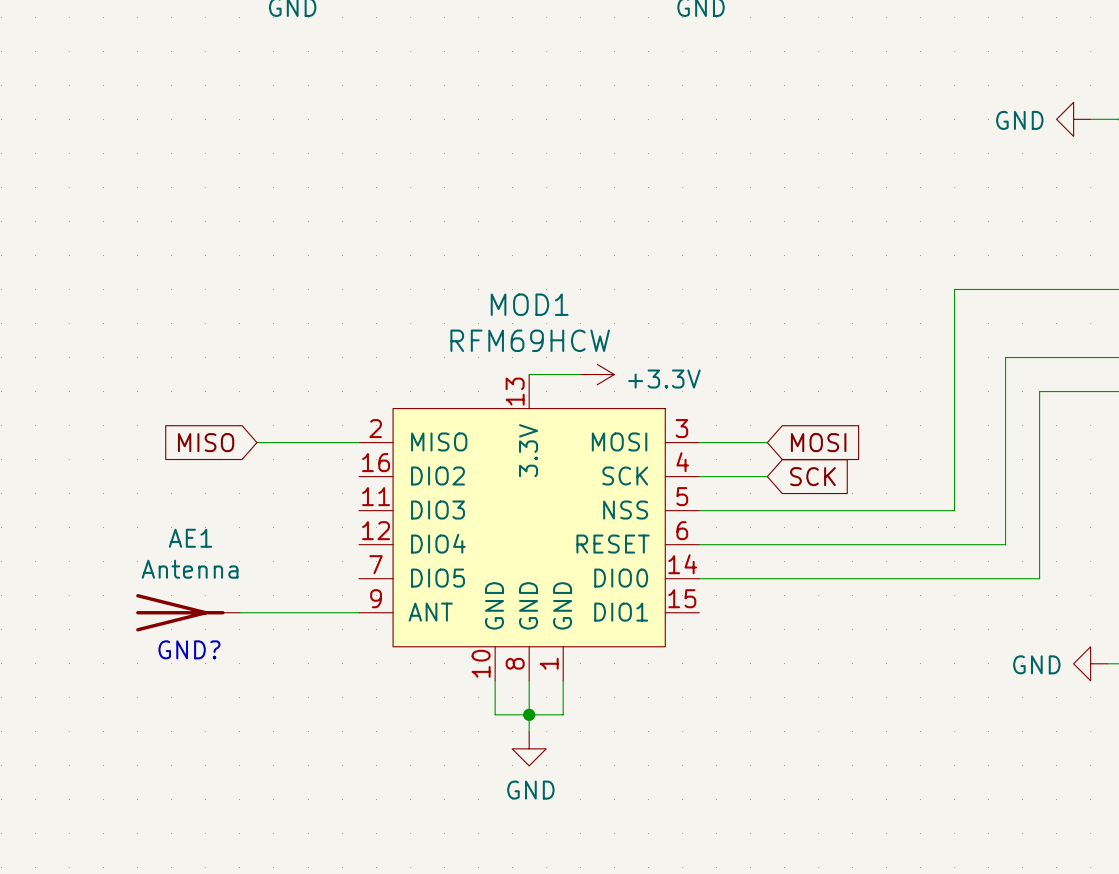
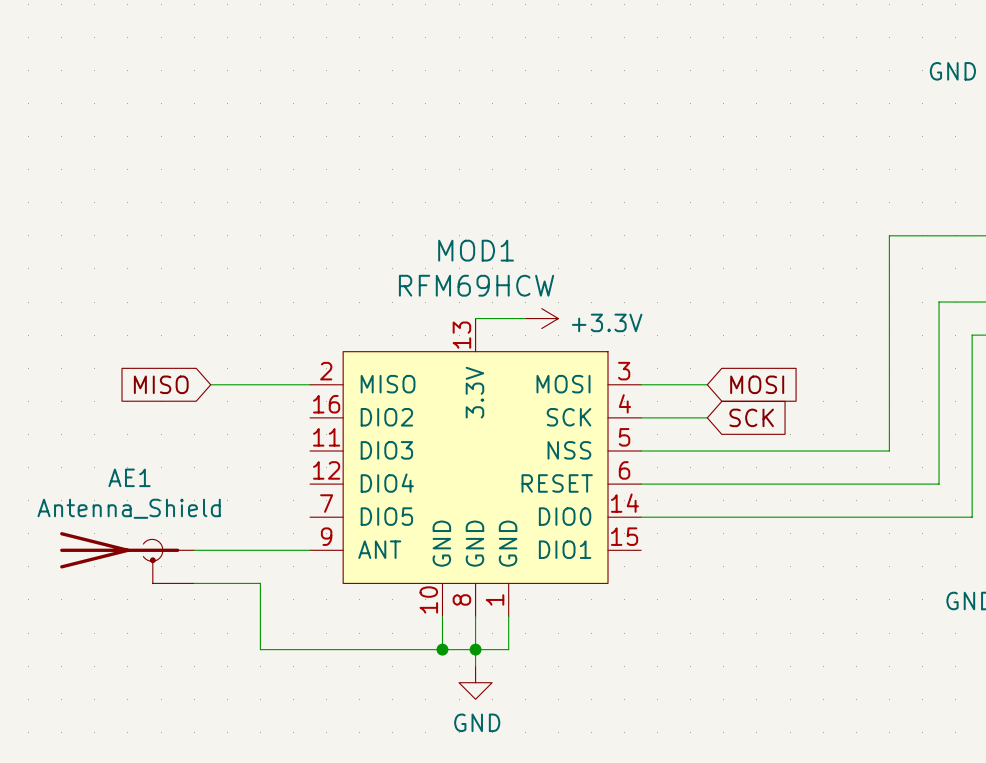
AE1 value: Antenna (190, 569) -> Antenna_Shield (129, 508)
AE1 symbol: [136, 594, 240, 632] -> [60, 532, 195, 584]
wire: none -> (194, 583) (260, 583) (260, 649) (442, 649)
text: GND? (189, 649) -> none
junction: none -> (442, 649)

